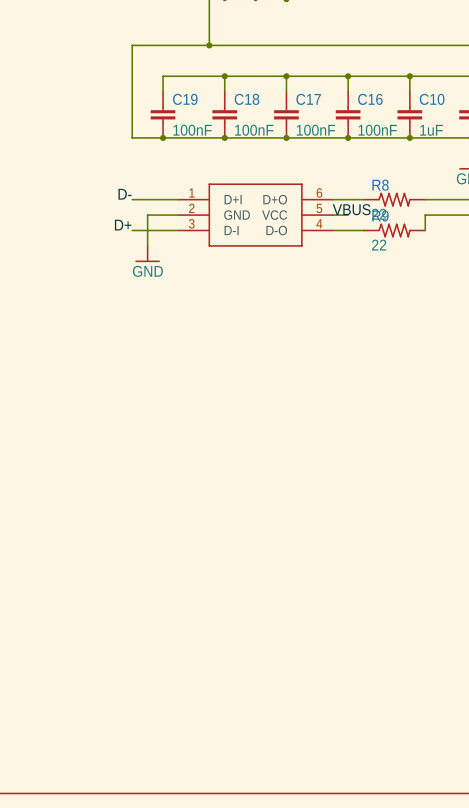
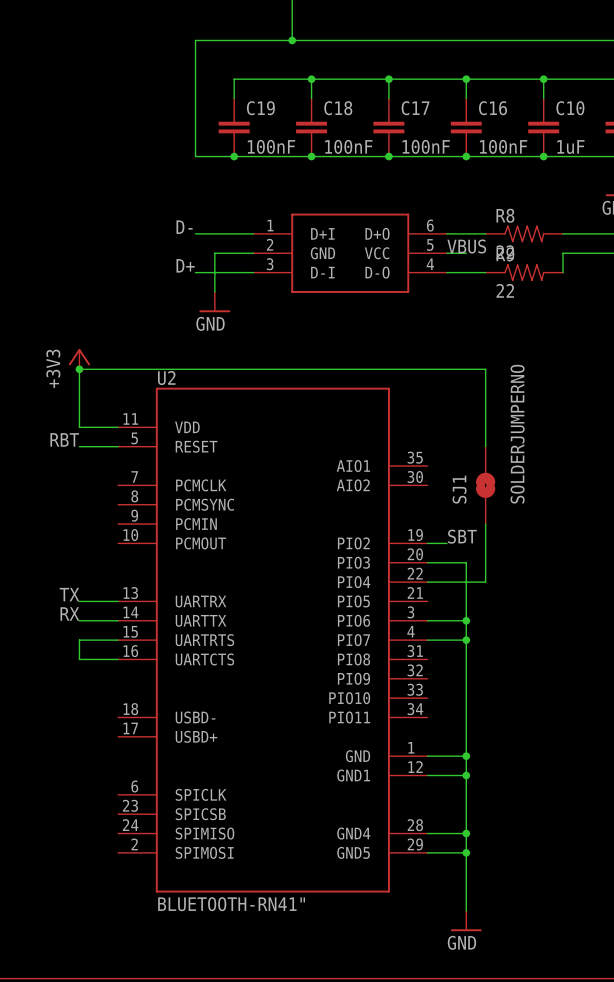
power symbol: none -> +3V3 (79, 359)
junction: none -> (79, 369)
wire: none -> (118, 427) (79, 427) (79, 369) (485, 369) (485, 446)
label: none -> RBT (64, 439)
wire: none -> (79, 446) (118, 446)
SJ1: none -> SOLDERJUMPERNO (485, 485)
wire: none -> (485, 524) (485, 582) (427, 582)
label: none -> SBT (462, 536)
wire: none -> (427, 543) (446, 543)
wire: none -> (427, 562) (466, 562) (466, 910)
label: none -> TX (69, 594)
wire: none -> (79, 601) (118, 601)
label: none -> RX (69, 614)
wire: none -> (79, 620) (118, 620)
wire: none -> (427, 620) (466, 620)
junction: none -> (466, 620)
wire: none -> (118, 640) (79, 640) (79, 659) (118, 659)
U2: none -> BLUETOOTH-RN41" (272, 640)
wire: none -> (427, 640) (466, 640)
junction: none -> (466, 640)
wire: none -> (427, 756) (466, 756)
junction: none -> (466, 756)
wire: none -> (427, 775) (466, 775)
junction: none -> (466, 775)
wire: none -> (427, 833) (466, 833)
junction: none -> (466, 833)
wire: none -> (427, 852) (466, 852)
junction: none -> (466, 852)
power symbol: none -> GND (466, 921)

